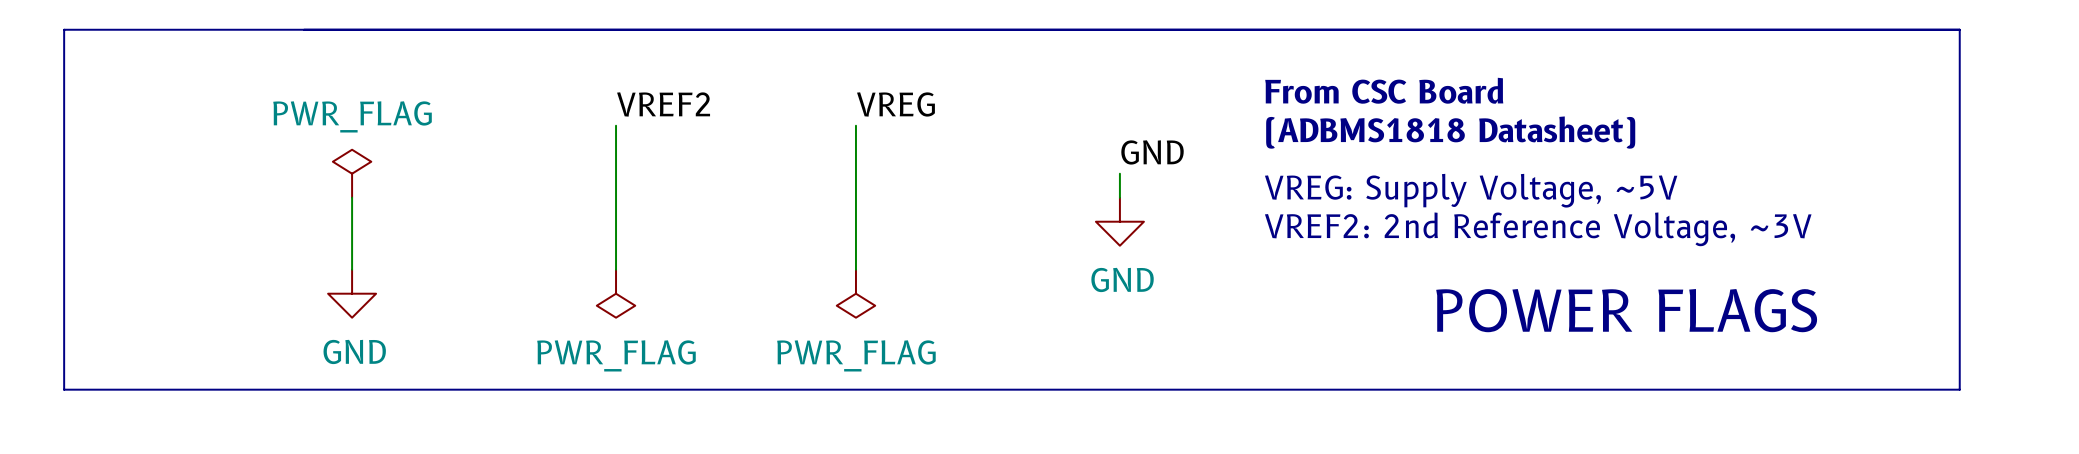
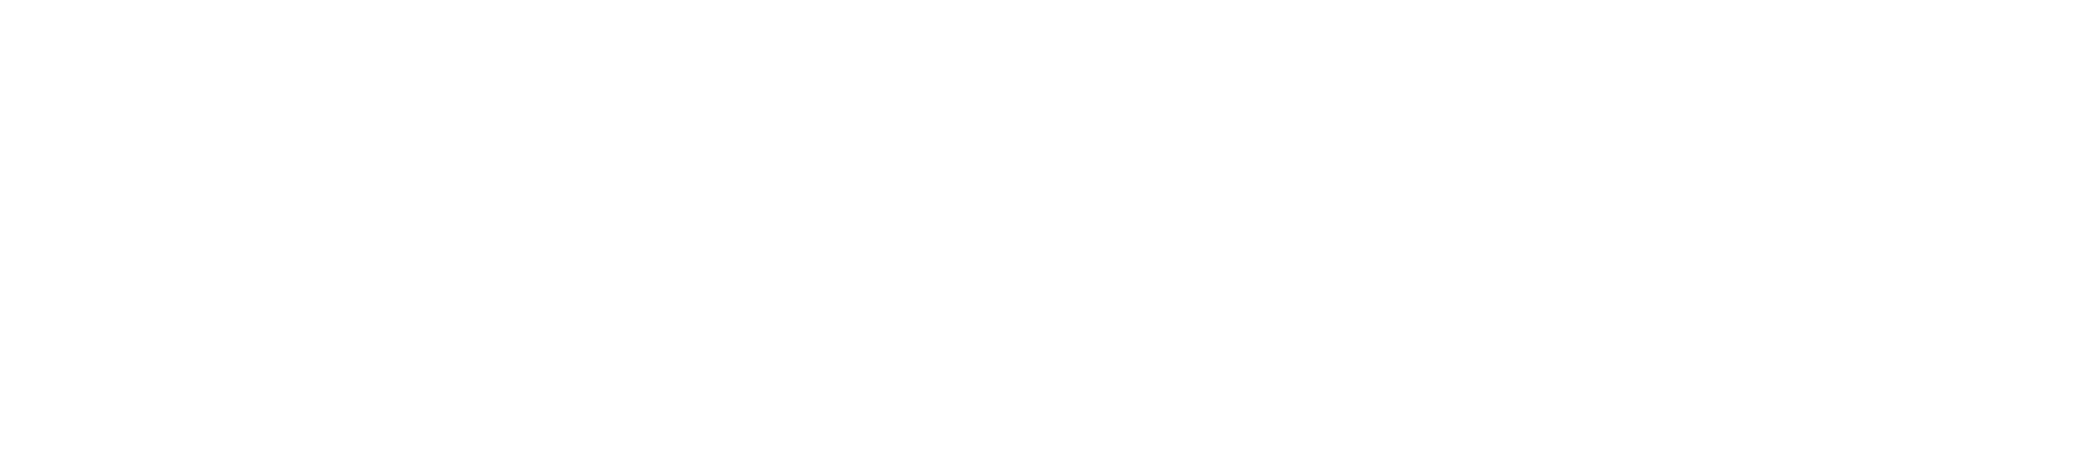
line: (64, 29) (1959, 29) (1959, 389) (64, 389) (64, 29) -> none
text: From CSC Board (1384, 90) -> none
label: VREF2 (663, 104) -> none
label: VREG (895, 104) -> none
wire: (616, 125) (616, 269) -> none
wire: (855, 125) (855, 269) -> none
text: (ADBMS1818 Datasheet) (1450, 132) -> none
label: GND (1152, 152) -> none
power symbol: PWR_FLAG (352, 173) -> none
wire: (1119, 173) (1119, 197) -> none
text: VREG: Supply Voltage, ~5V (1471, 190) -> none
wire: (352, 197) (352, 269) -> none
power symbol: GND (1119, 221) -> none
text: VREF2: 2nd Reference Voltage, ~3V (1538, 229) -> none
power symbol: GND (352, 293) -> none
power symbol: PWR_FLAG (616, 293) -> none
power symbol: PWR_FLAG (855, 293) -> none
text: POWER FLAGS (1626, 310) -> none

